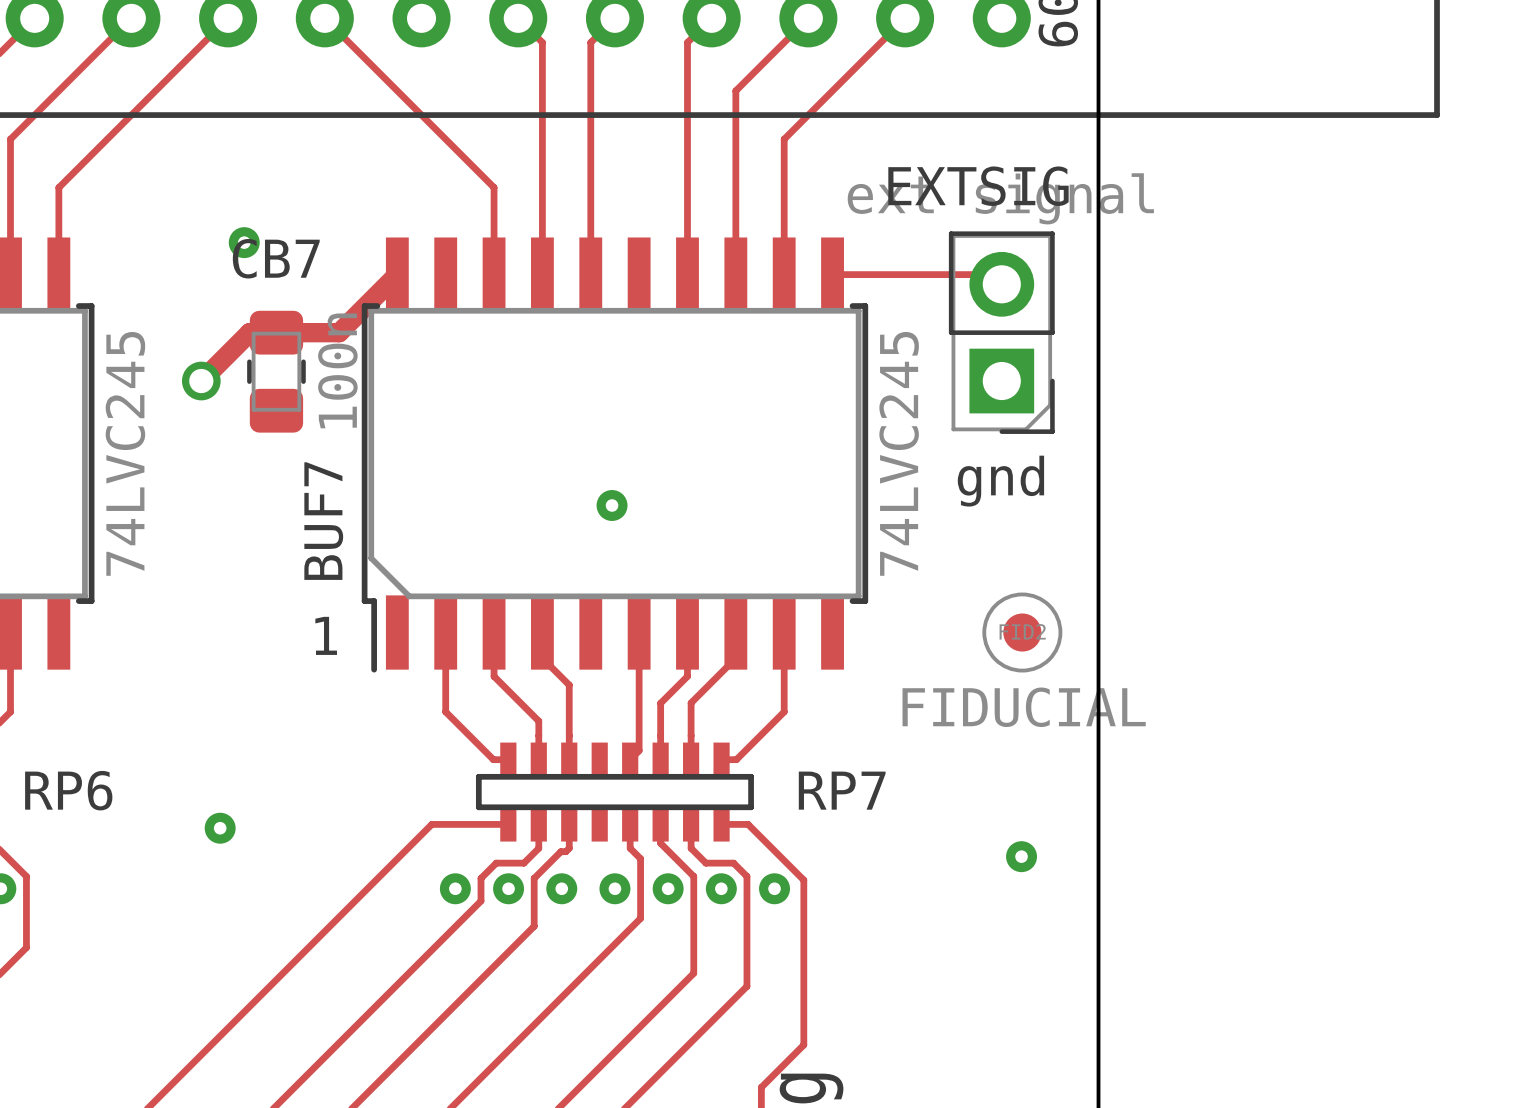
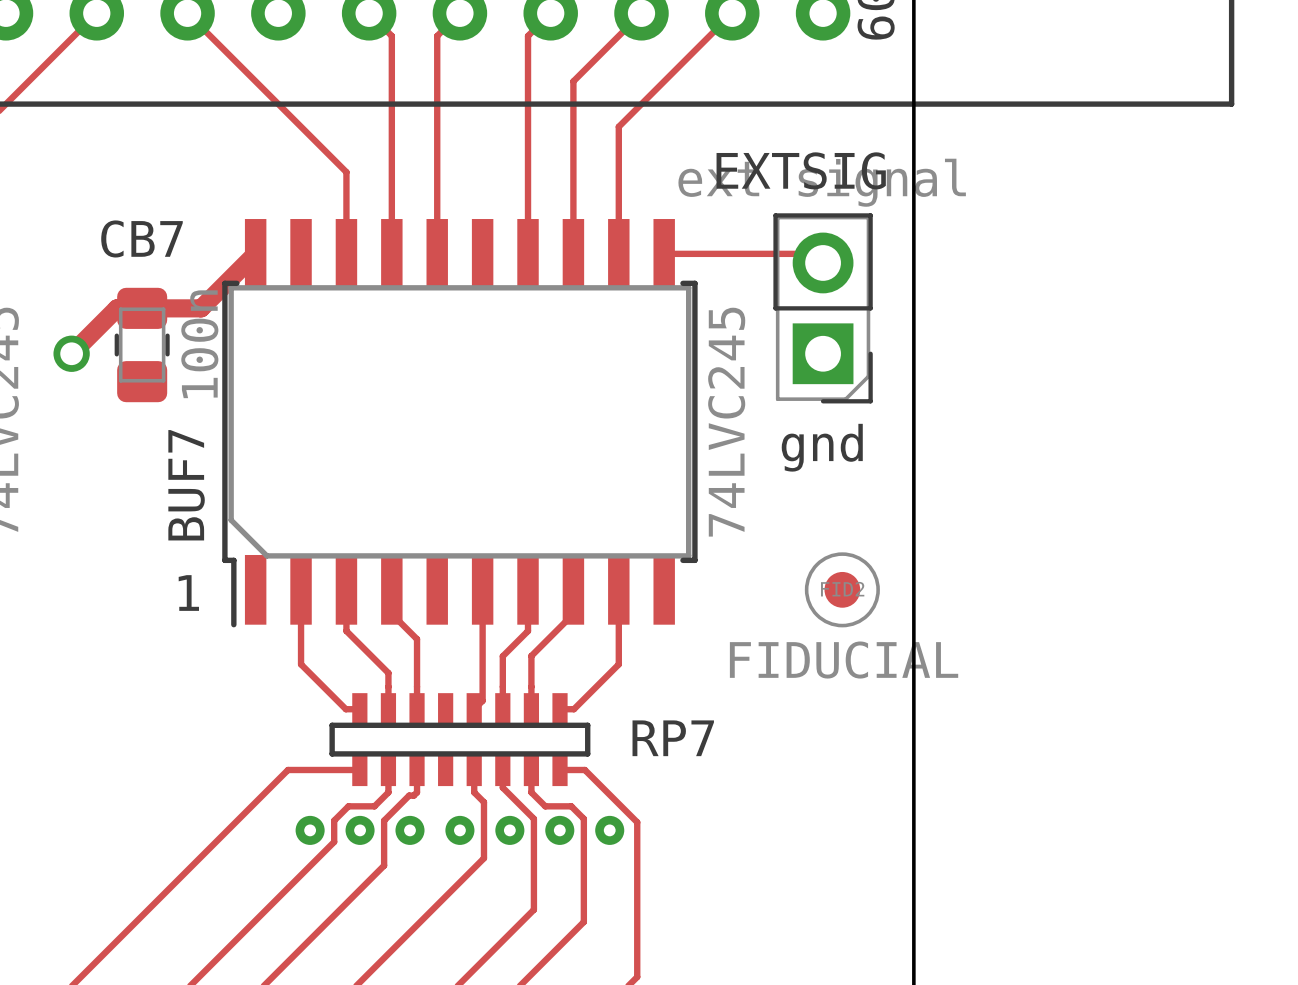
part: (244, 242) -> none
part: (612, 505) -> none
part: (220, 828) -> none
part: (1021, 856) -> none

